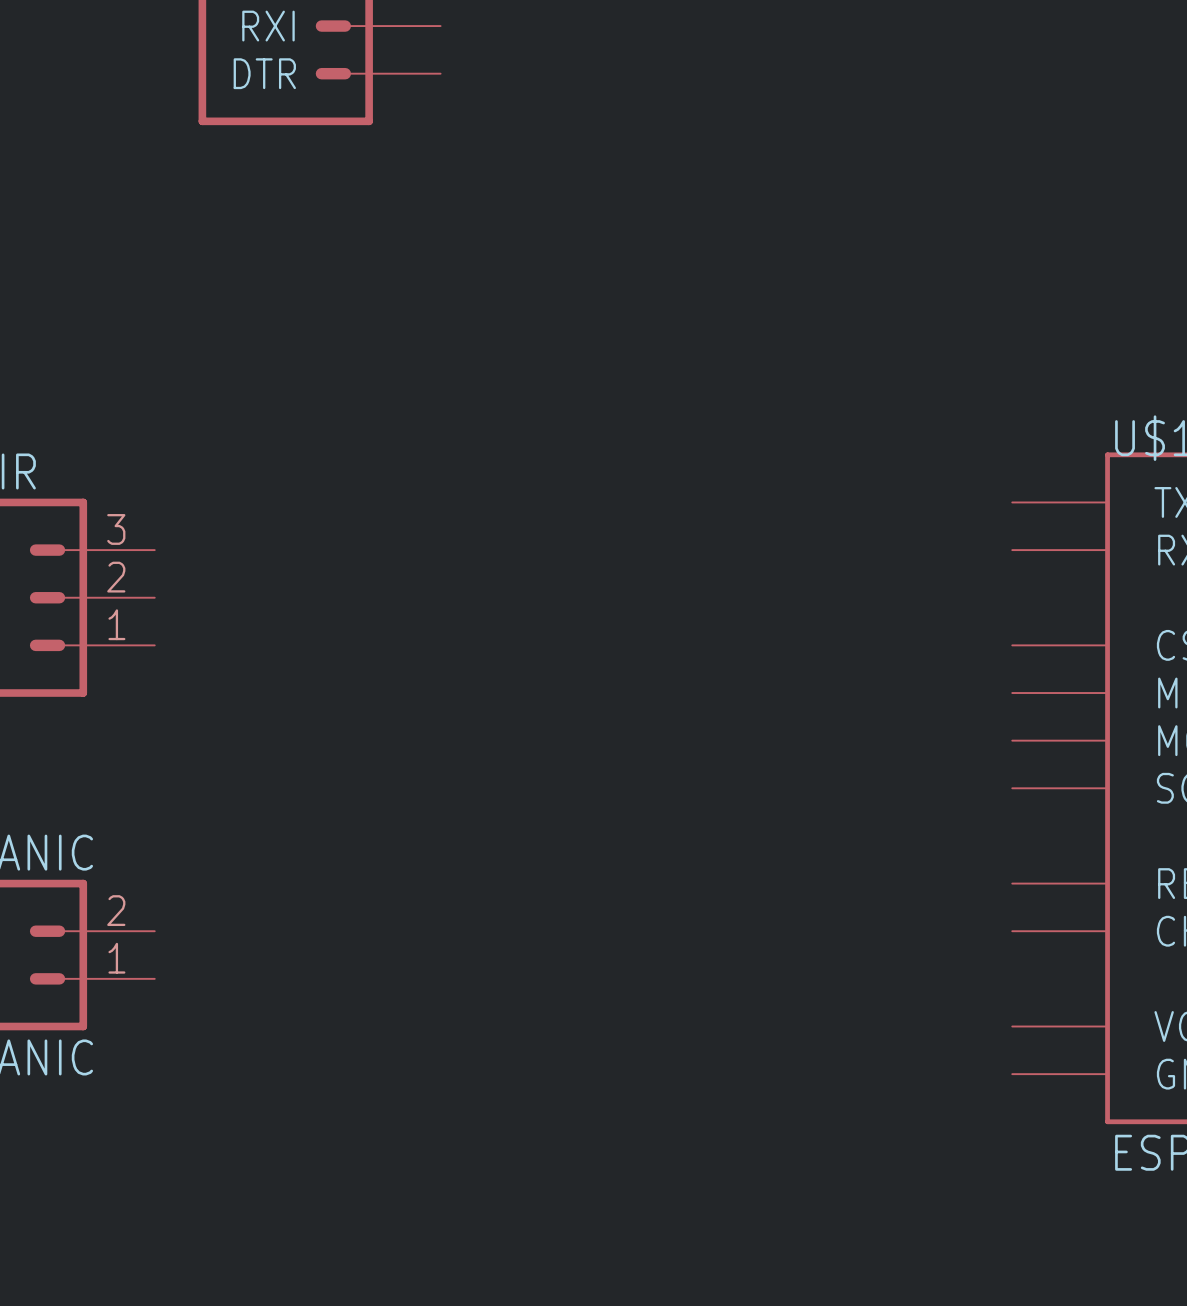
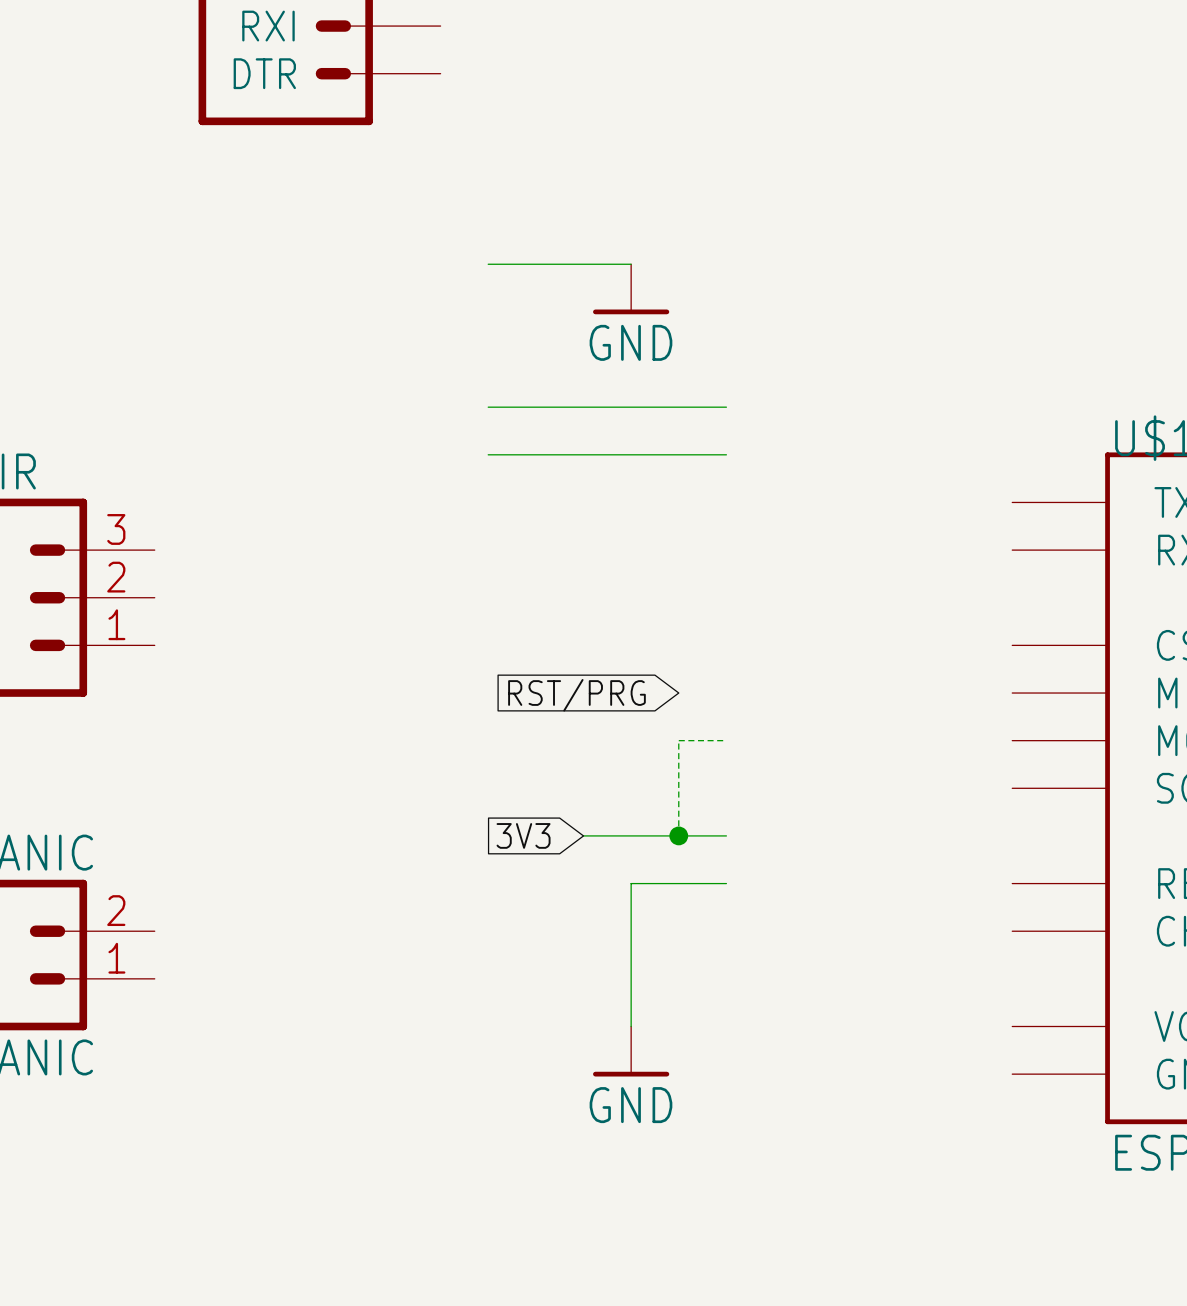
wire: none -> (488, 264) (631, 264)
power symbol: none -> GND (631, 289)
wire: none -> (488, 407) (726, 407)
wire: none -> (488, 454) (726, 454)
global label: none -> RST/PRG (576, 695)
wire: none -> (726, 740) (678, 740) (678, 835)
global label: none -> 3V3 (523, 835)
wire: none -> (583, 835) (726, 835)
junction: none -> (678, 835)
wire: none -> (726, 883) (631, 883) (631, 1026)
power symbol: none -> GND (631, 1051)

